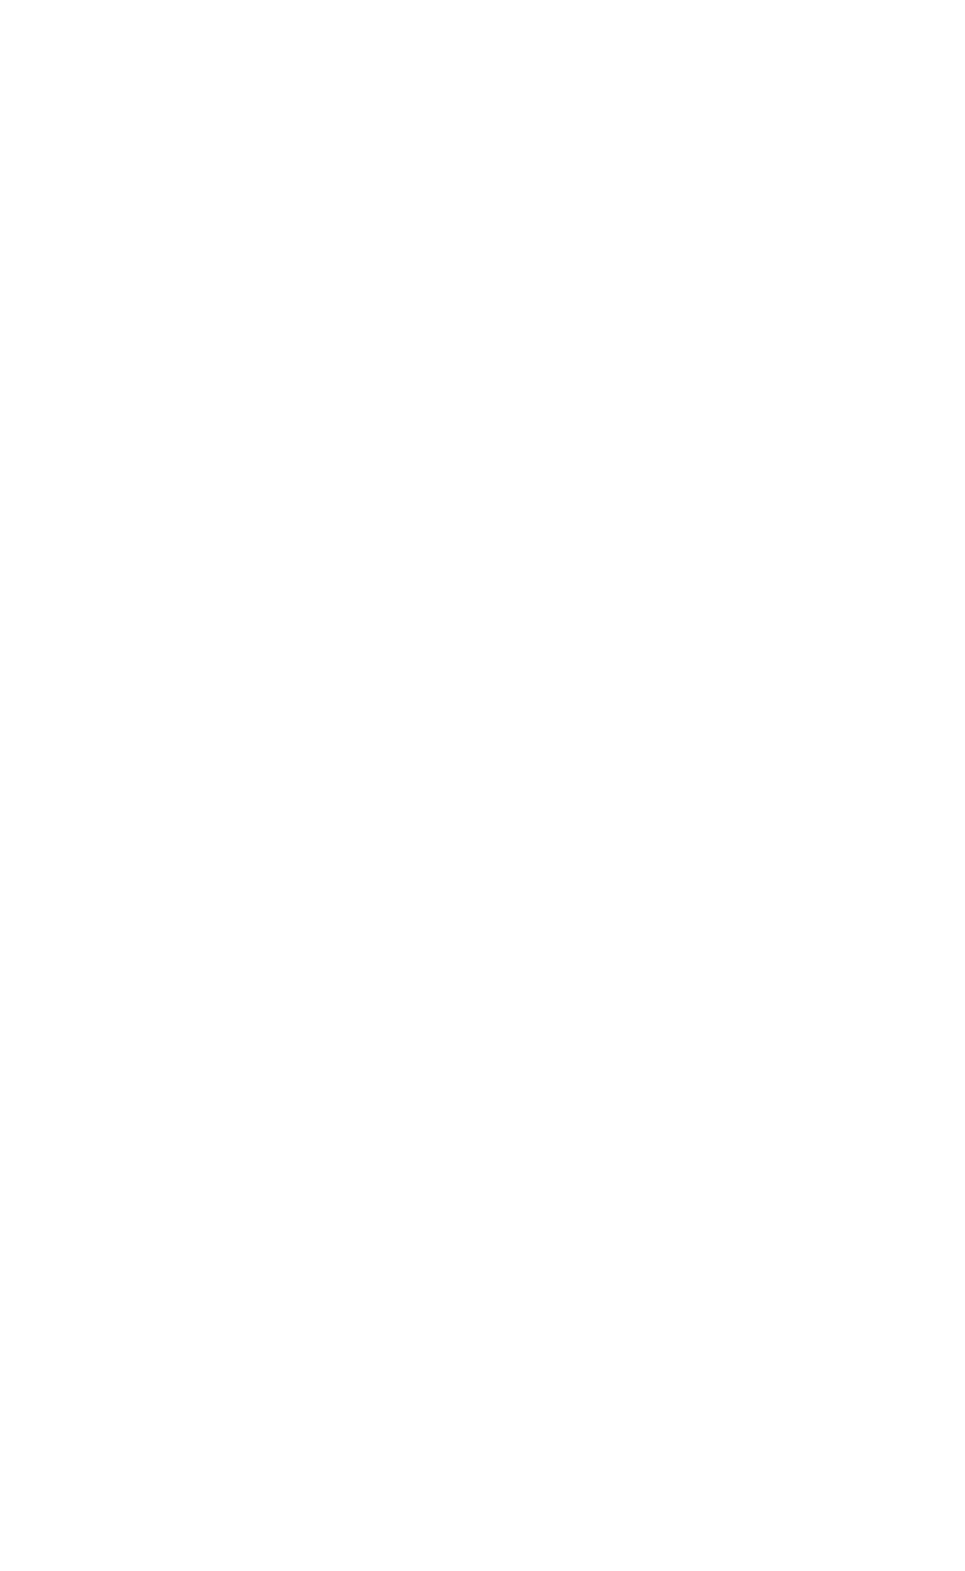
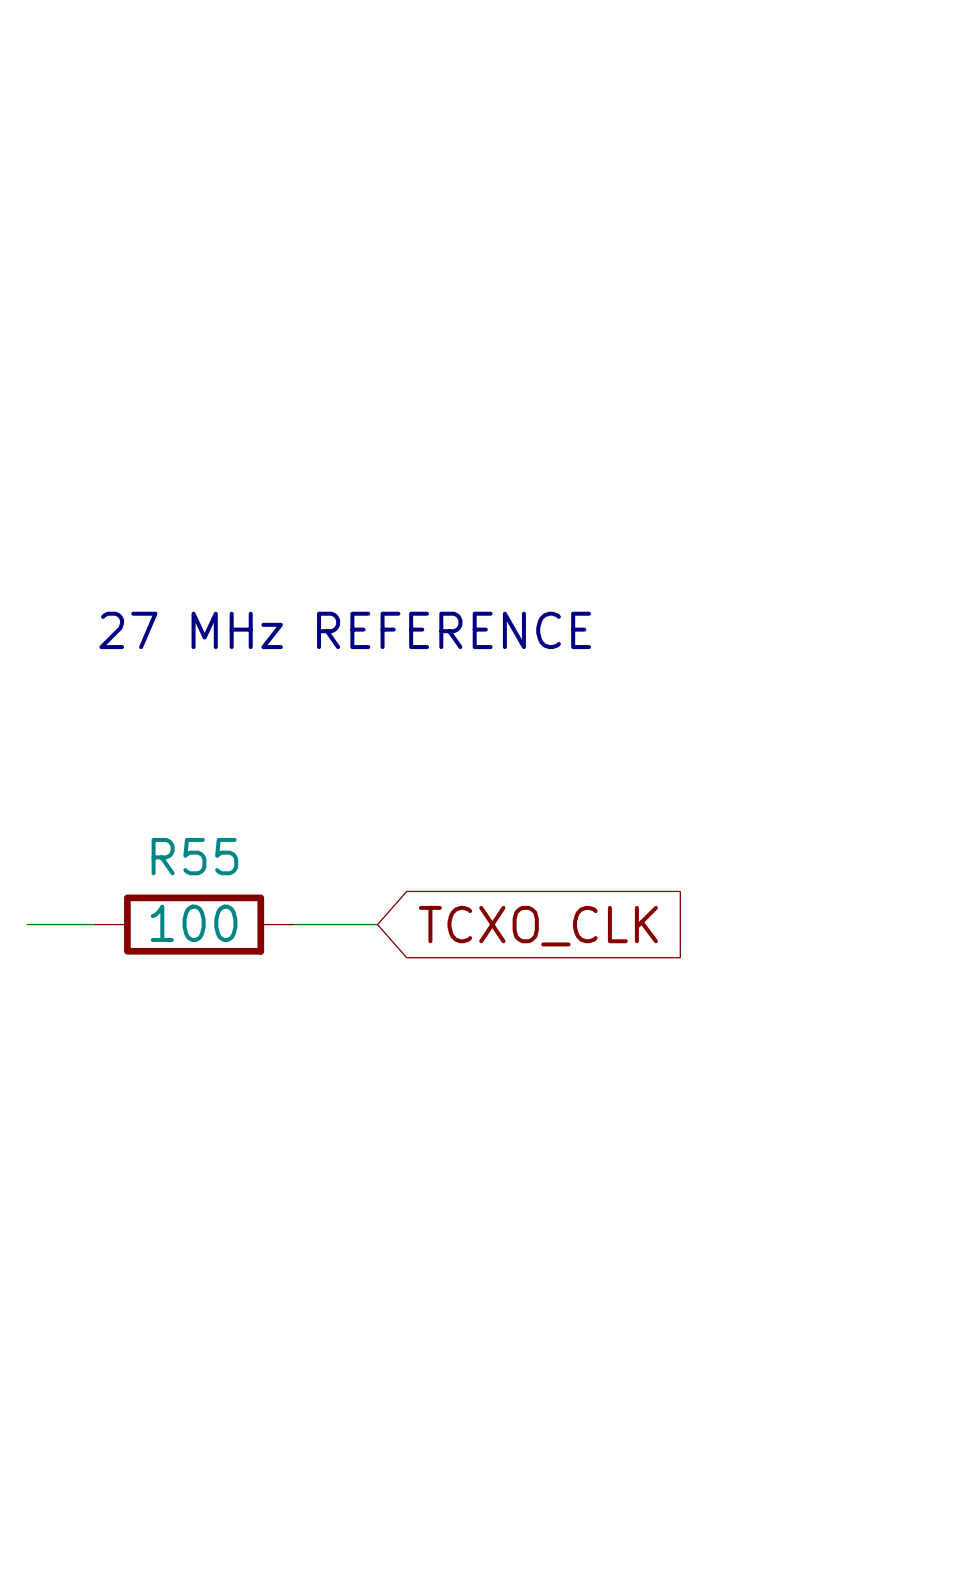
text: none -> 27 MHz REFERENCE (345, 630)
wire: none -> (27, 924) (94, 924)
R55: none -> 100 (194, 924)
wire: none -> (294, 924) (377, 924)
global label: none -> TCXO_CLK (538, 926)

